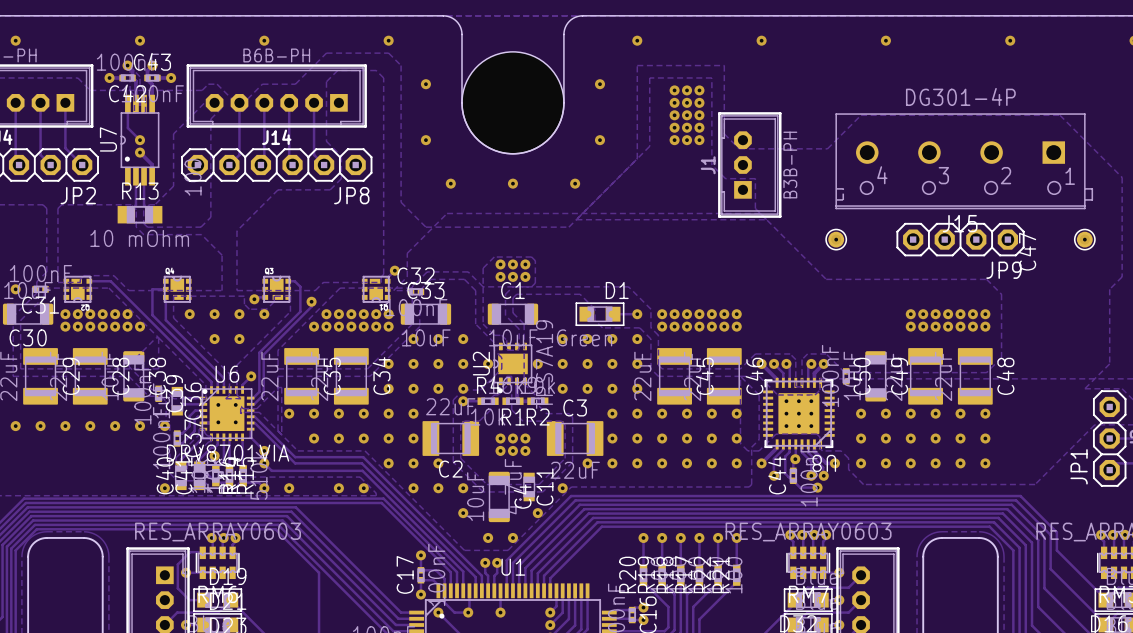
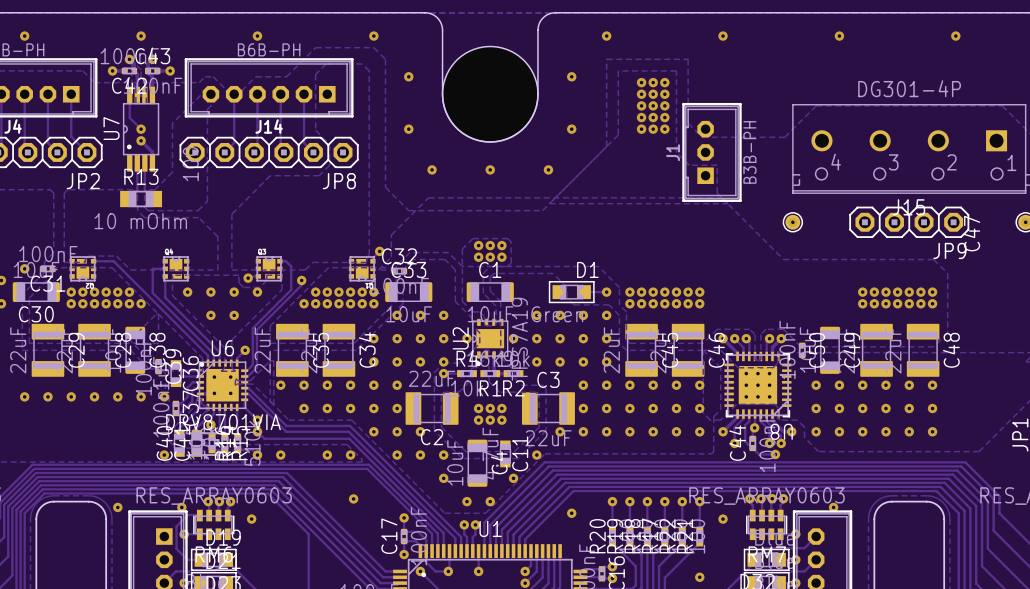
via: none -> (353, 498)
via: none -> (117, 507)
via: none -> (181, 507)
via: none -> (833, 507)
via: none -> (571, 513)
via: none -> (251, 519)
via: none -> (723, 519)
via: none -> (699, 577)

